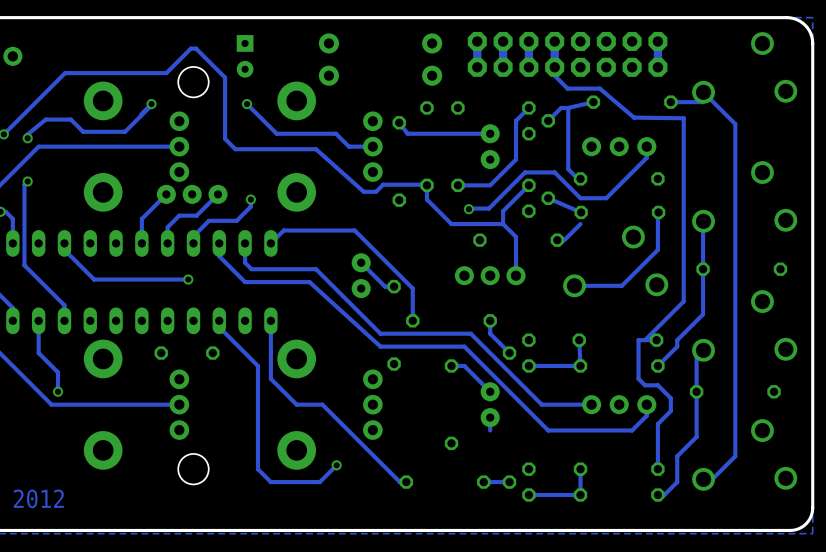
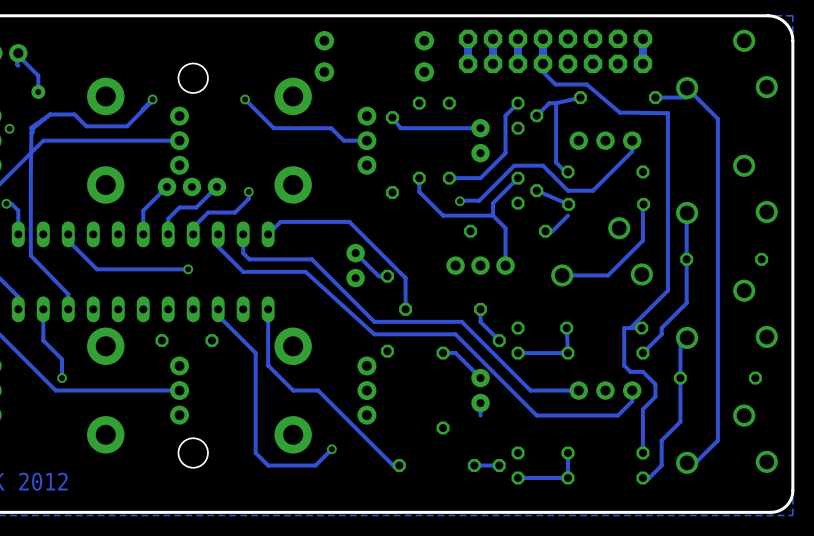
part: (245, 56) -> none
track: none -> (18, 65) (17, 54) (38, 75) (38, 91)
via: none -> (38, 91)
track: (3, 134) (65, 73) (166, 73) (190, 48) (196, 48) (225, 77) (225, 138) (235, 149) (316, 149) (363, 191) (376, 191) (383, 184) (426, 185) -> none
via: (27, 138) -> none
track: (27, 181) (24, 184) (24, 265) (64, 305) -> (50, 114) (31, 127) (30, 255) (68, 294)
via: (27, 181) -> none

